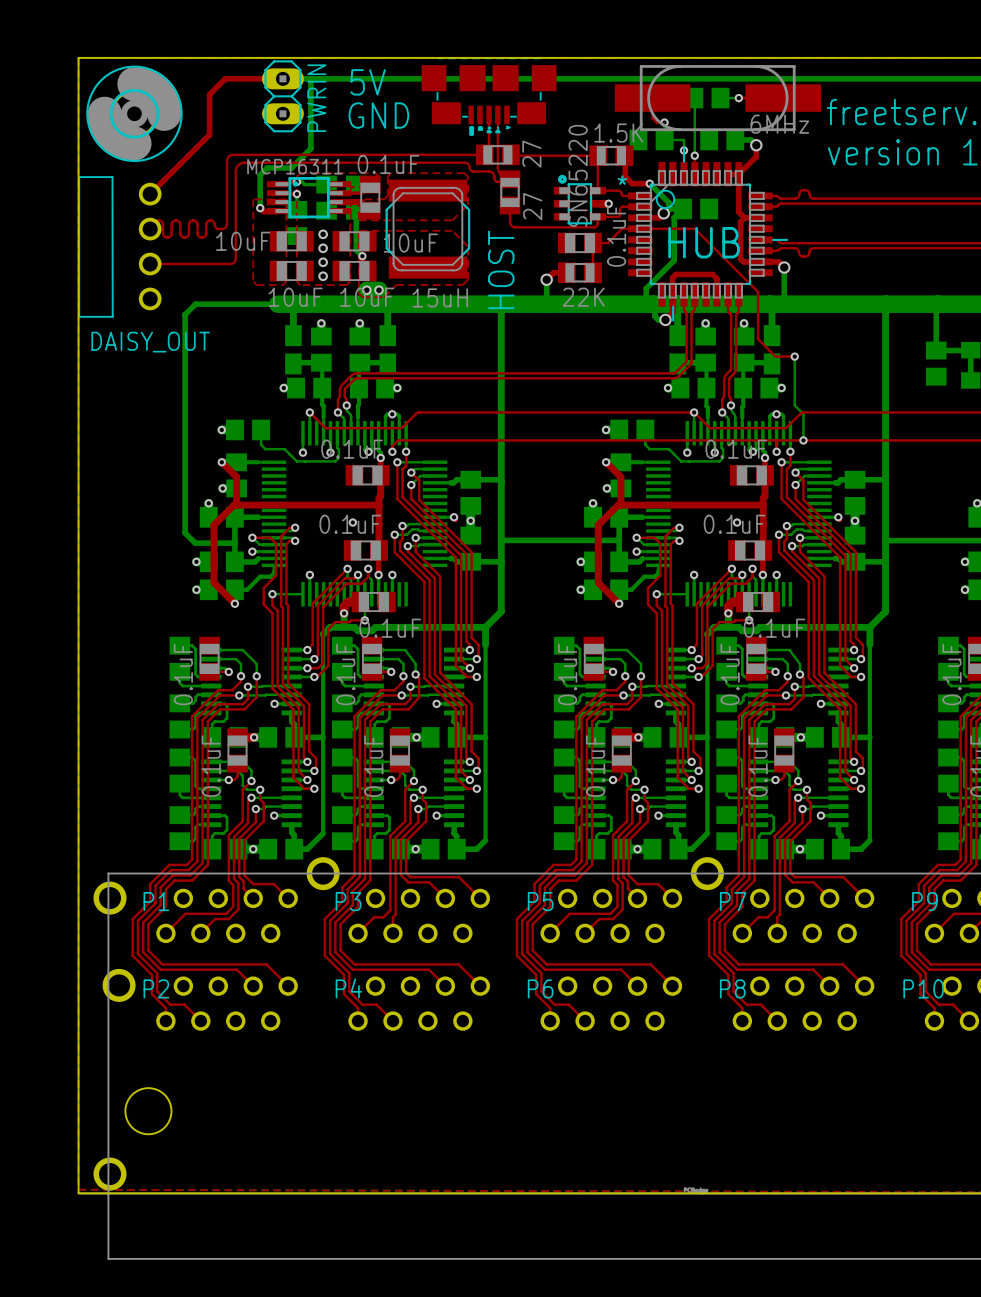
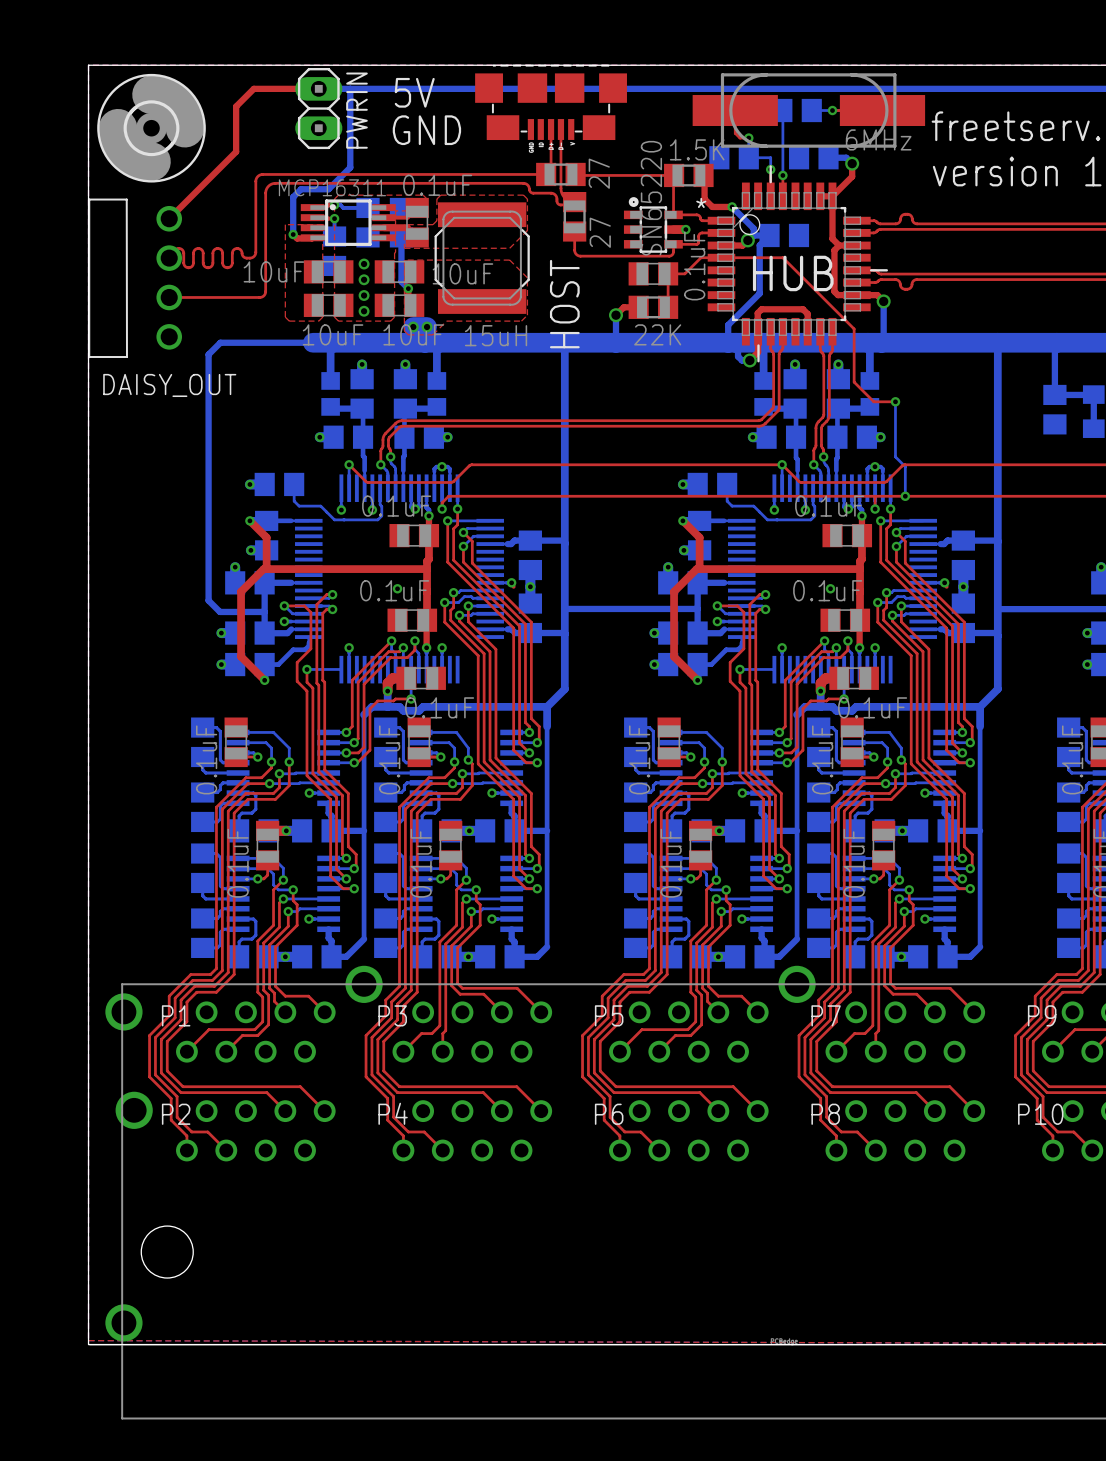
part footprint: [285, 325, 302, 375] -> [321, 372, 340, 416]
part footprint: [379, 325, 397, 375] -> [427, 372, 447, 416]
part footprint: [669, 325, 686, 375] -> [754, 372, 773, 416]
part footprint: [763, 325, 781, 375] -> [860, 372, 880, 416]

